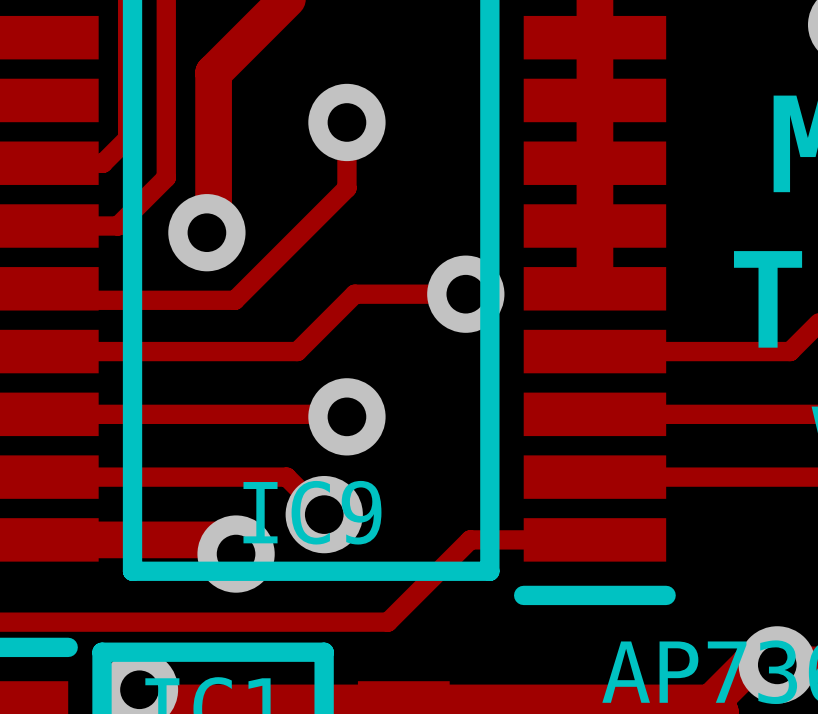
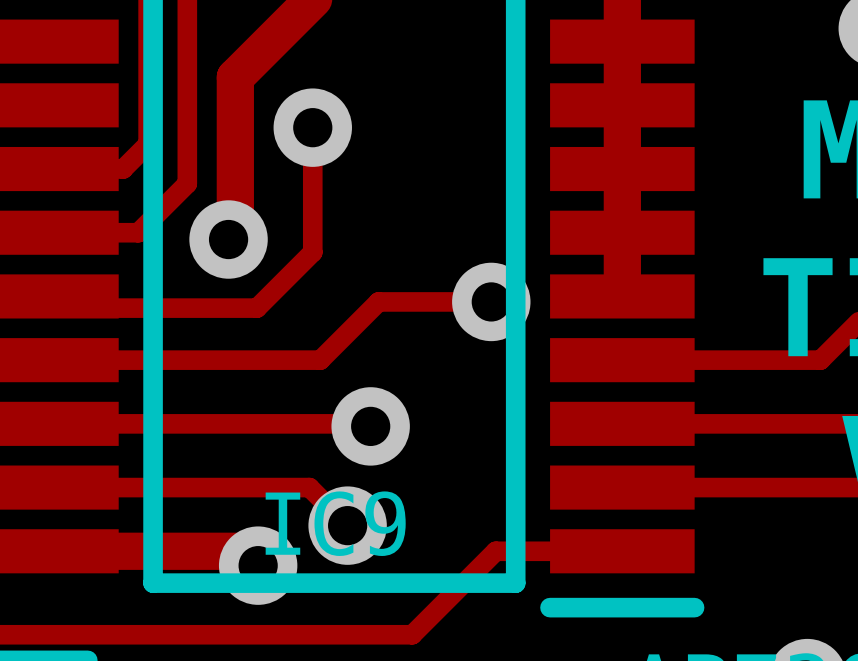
track: (346, 122) (346, 188) (289, 245) -> (312, 127) (312, 252)
via position: (346, 122) -> (312, 127)

